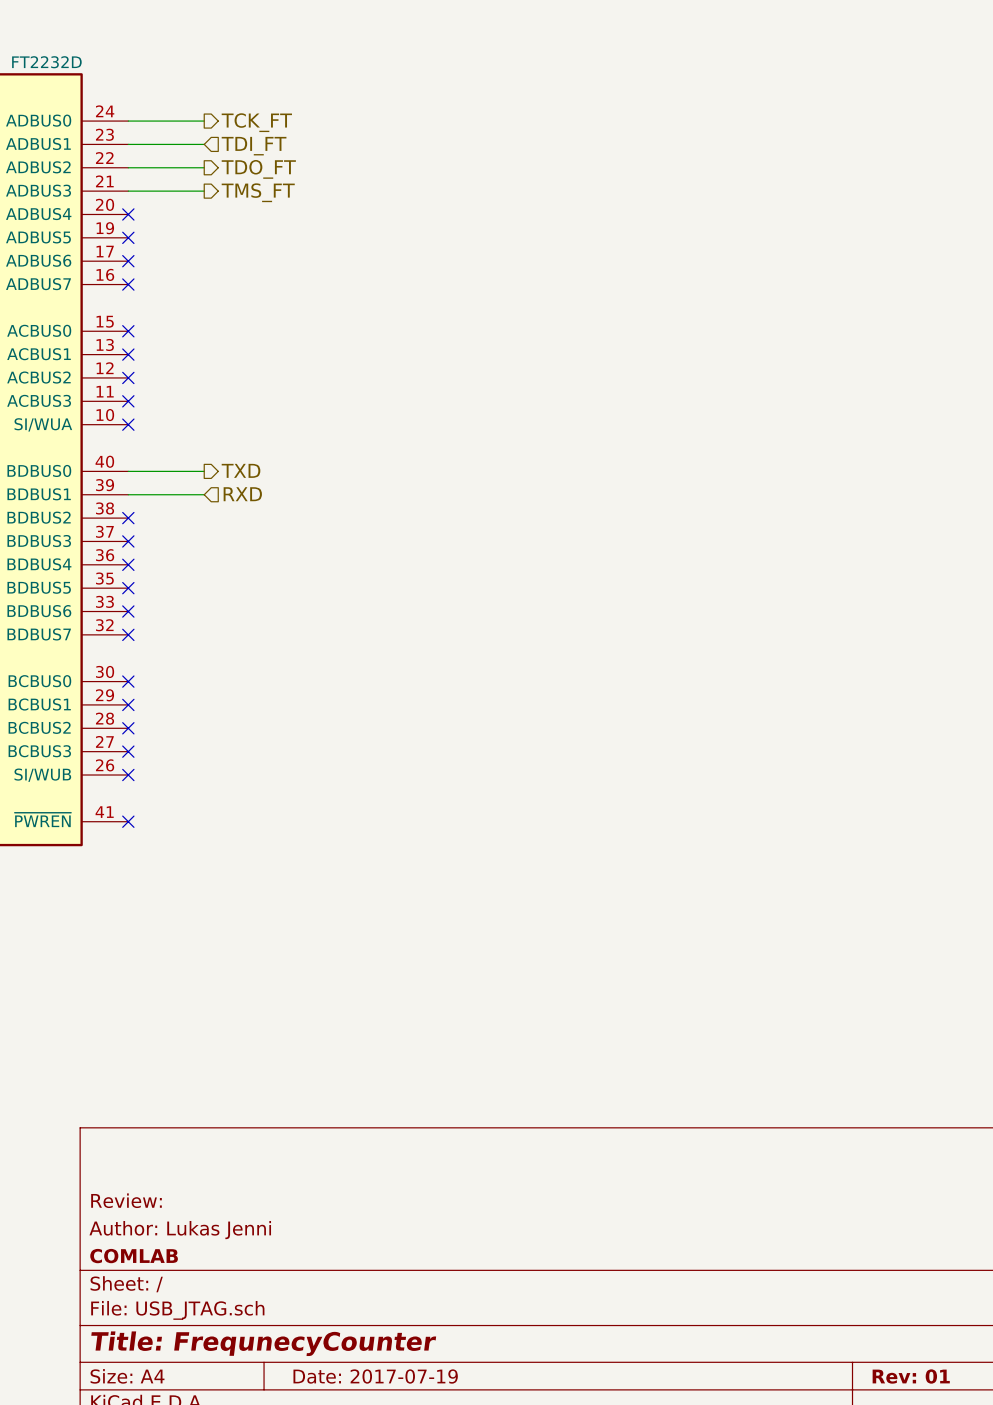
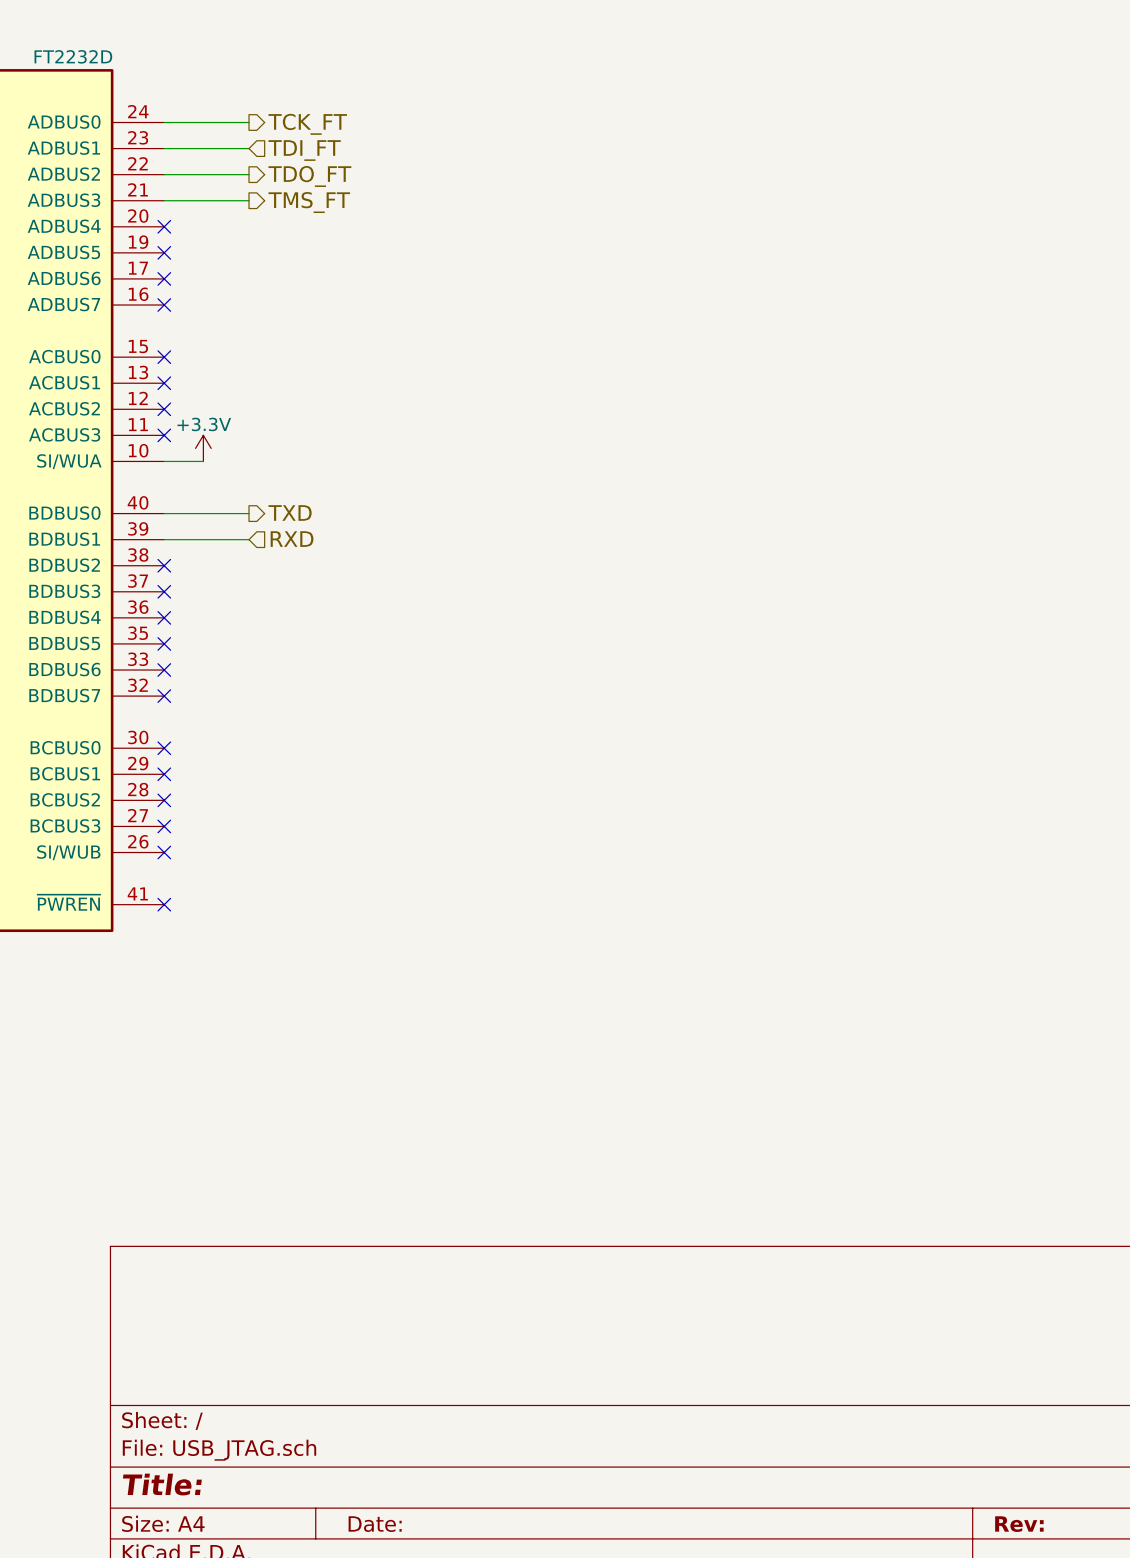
power symbol: none -> +3.3V (203, 448)
wire: none -> (164, 461) (203, 461)
no-connect mark: (128, 424) -> none
title block: Review: (126, 1200) -> none
title block: Author: Lukas Jenni (180, 1230) -> none
title block: COMLAB (134, 1256) -> none
title block: Title: FrequnecyCounter (263, 1343) -> Title: (162, 1484)
title block: Date: 2017-07-19 (375, 1376) -> Date: (375, 1524)
title block: Rev: 01 (911, 1376) -> Rev: (1019, 1524)

